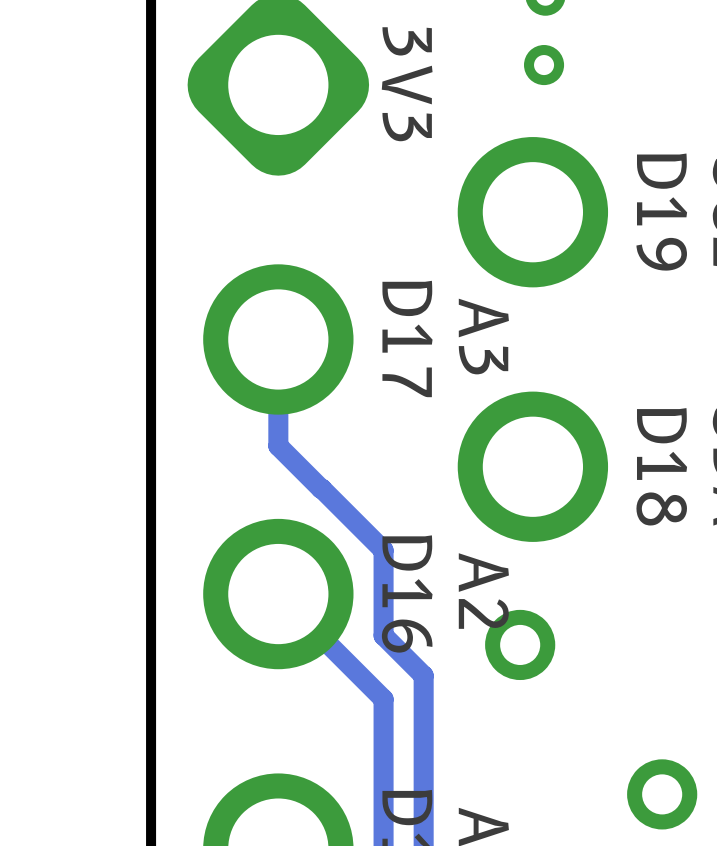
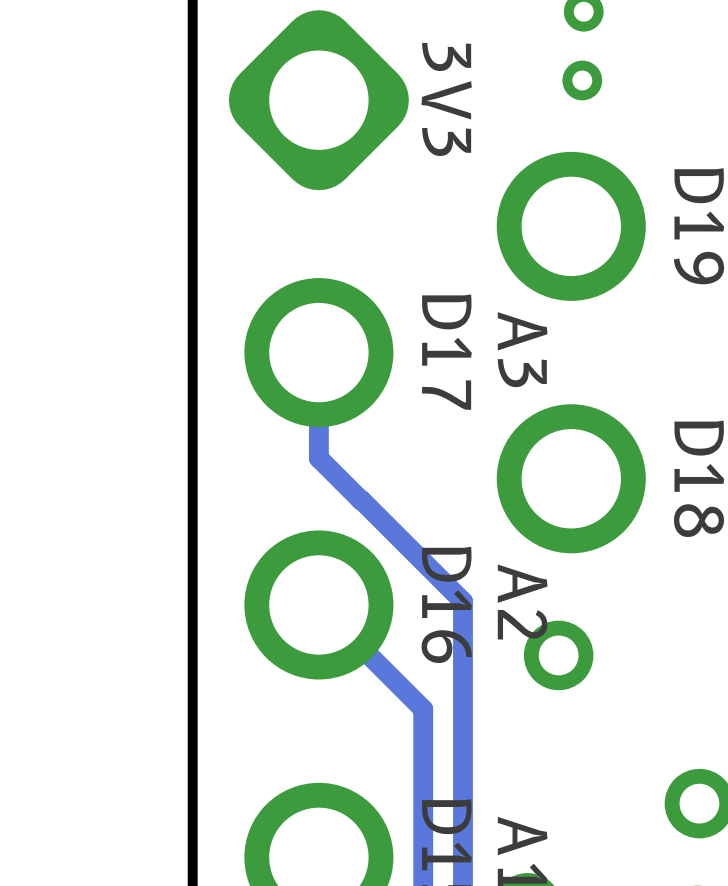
track: (383, 550) (383, 635) (423, 675) -> (423, 561) (462, 601) (462, 685)

